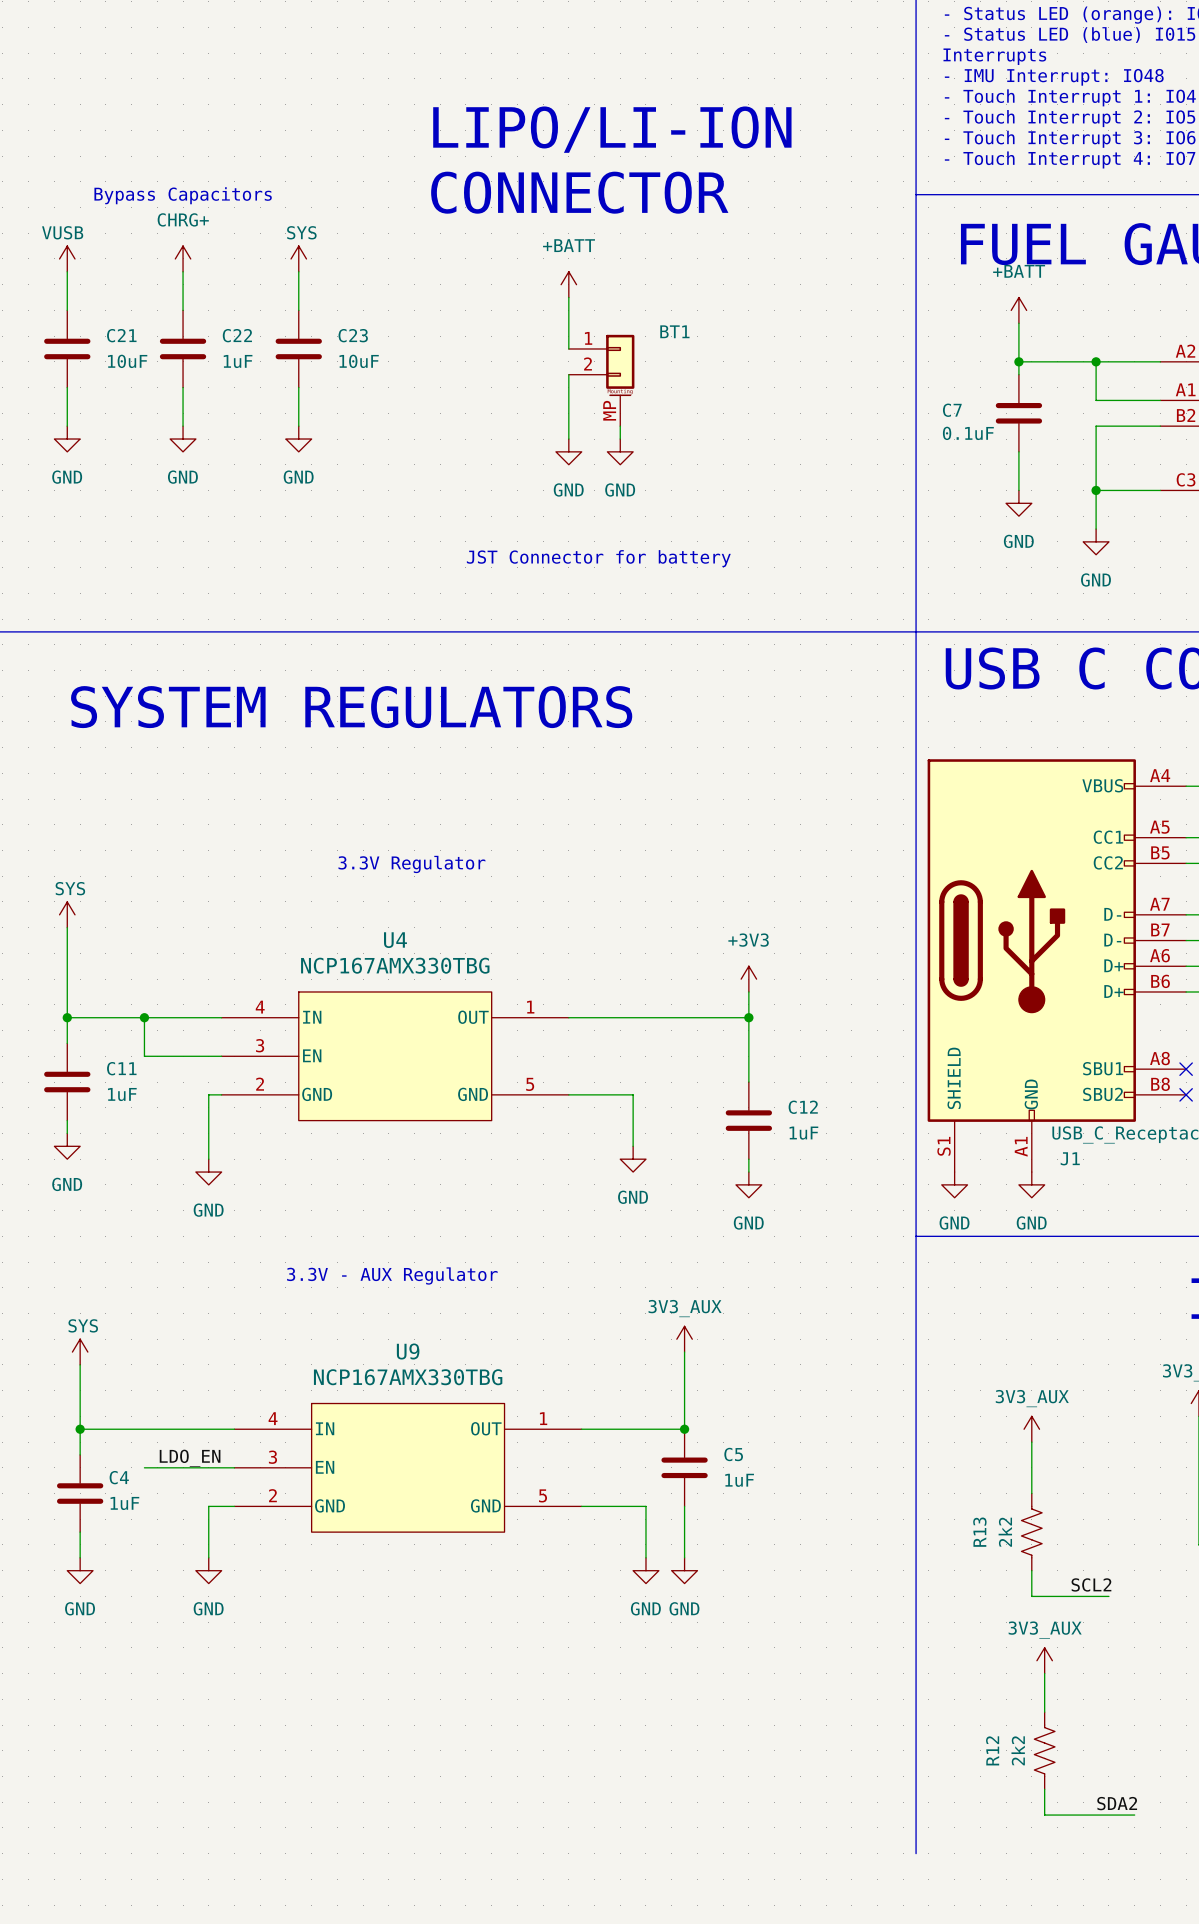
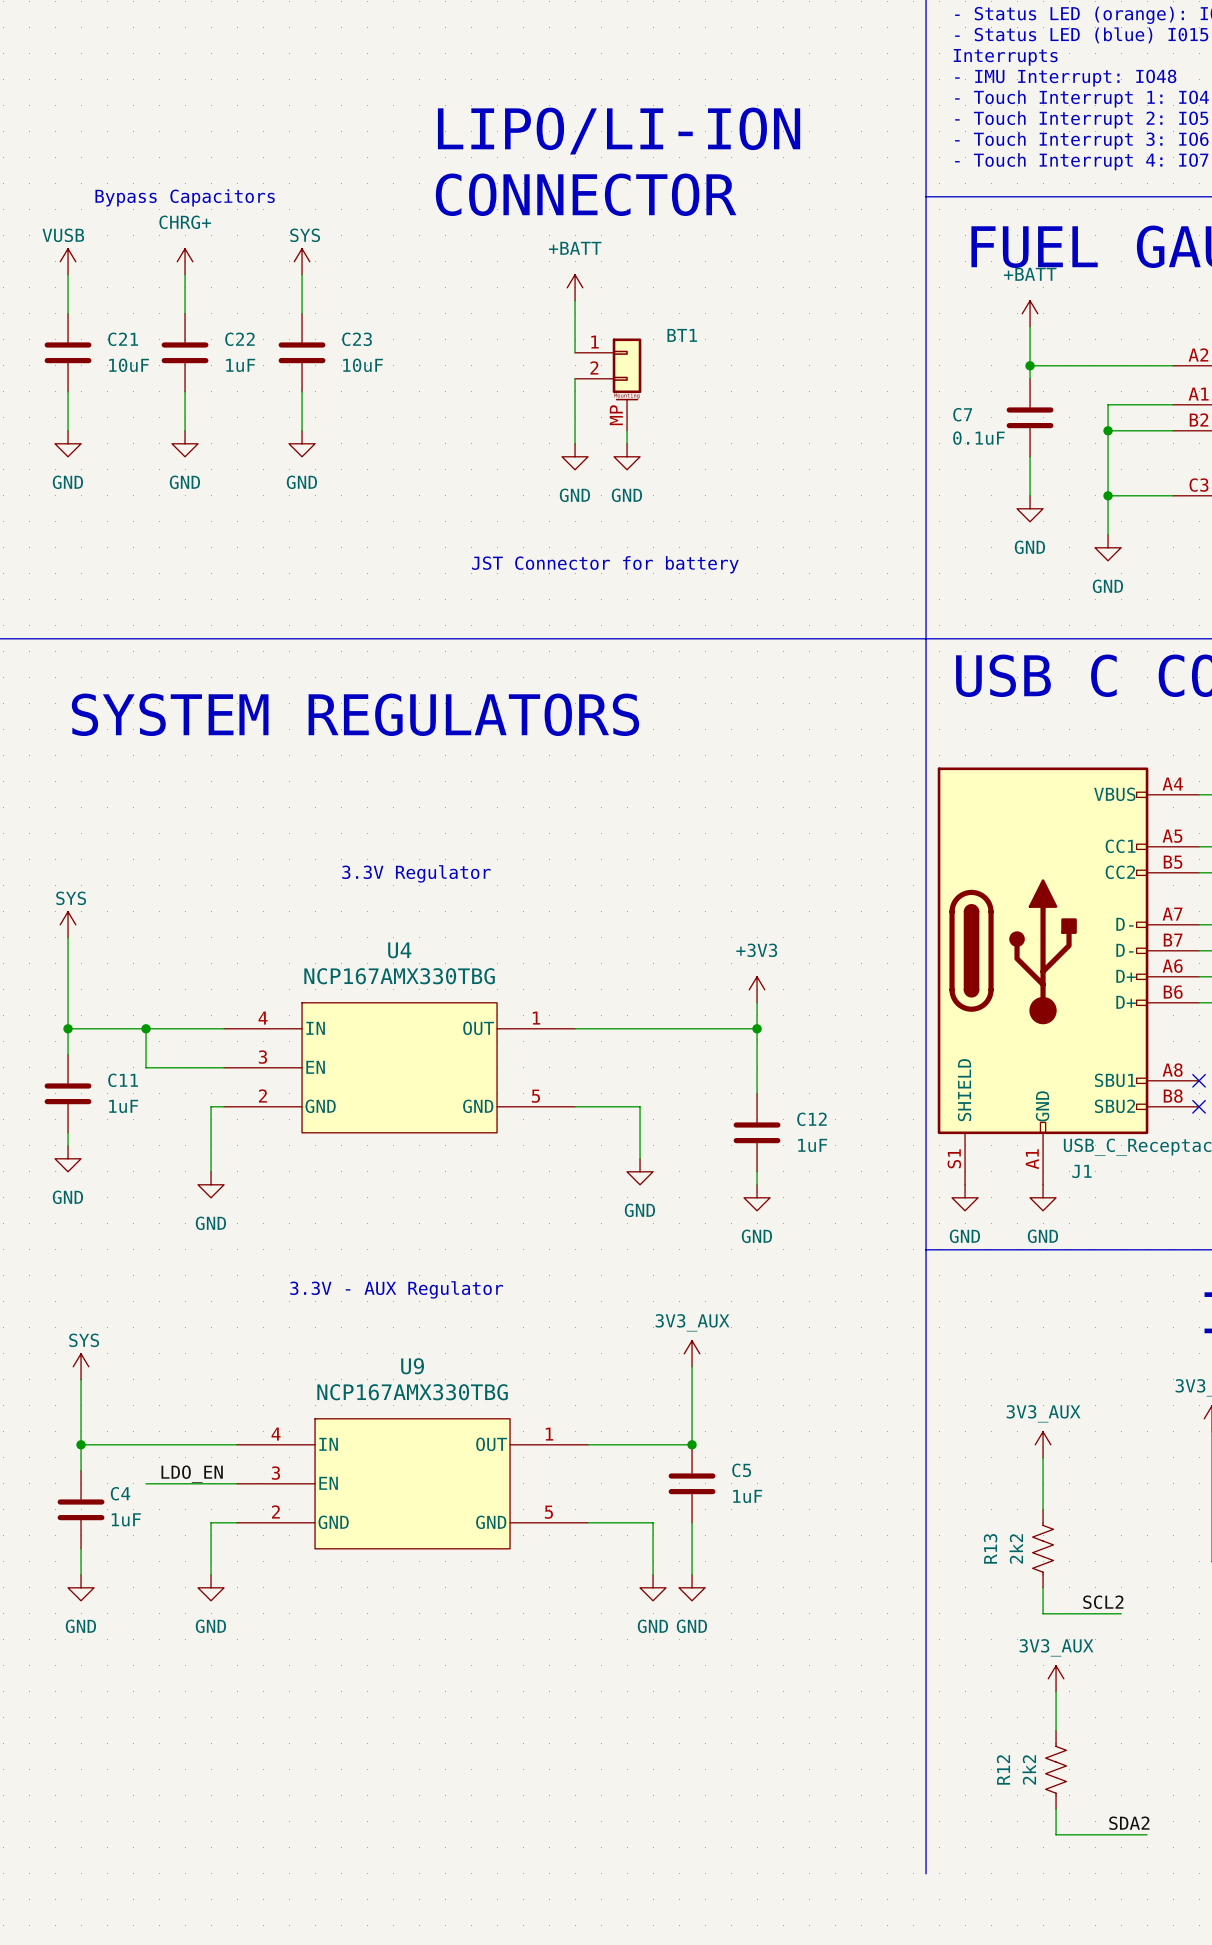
wire: (1096, 361) (1096, 400) -> (1108, 430) (1108, 404)
junction: (1096, 361) -> none
junction: none -> (1108, 430)

